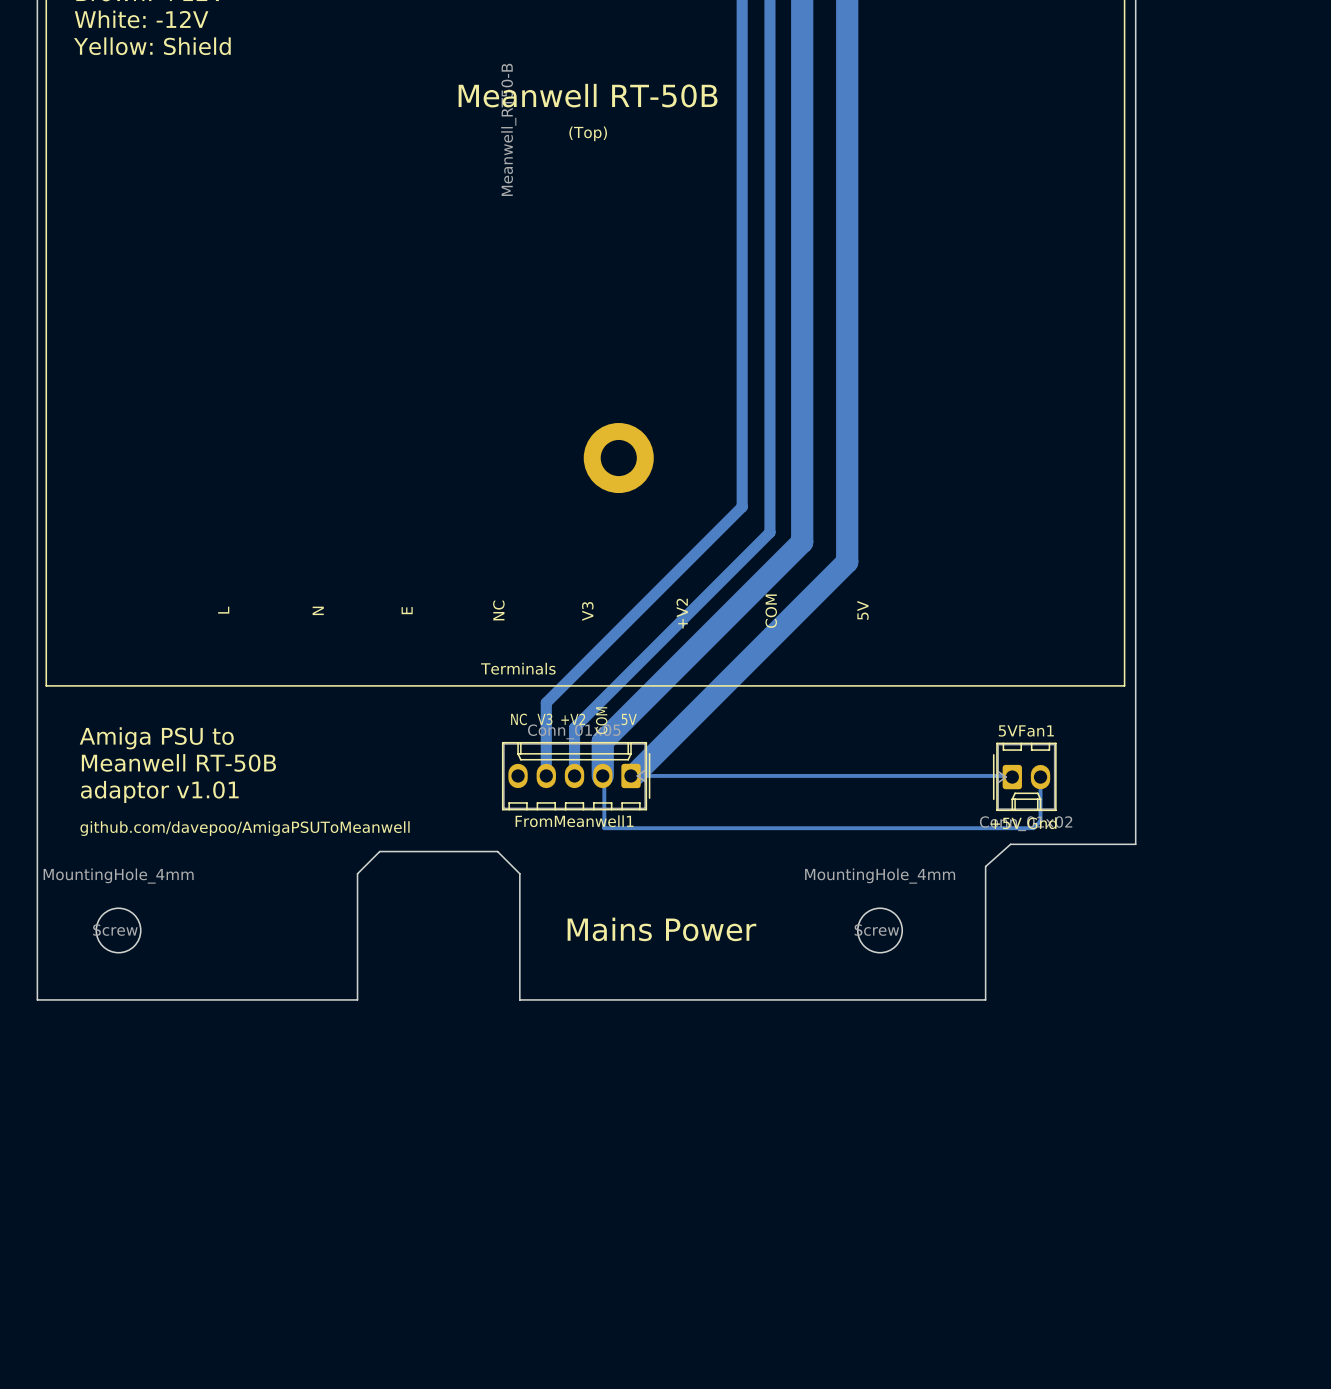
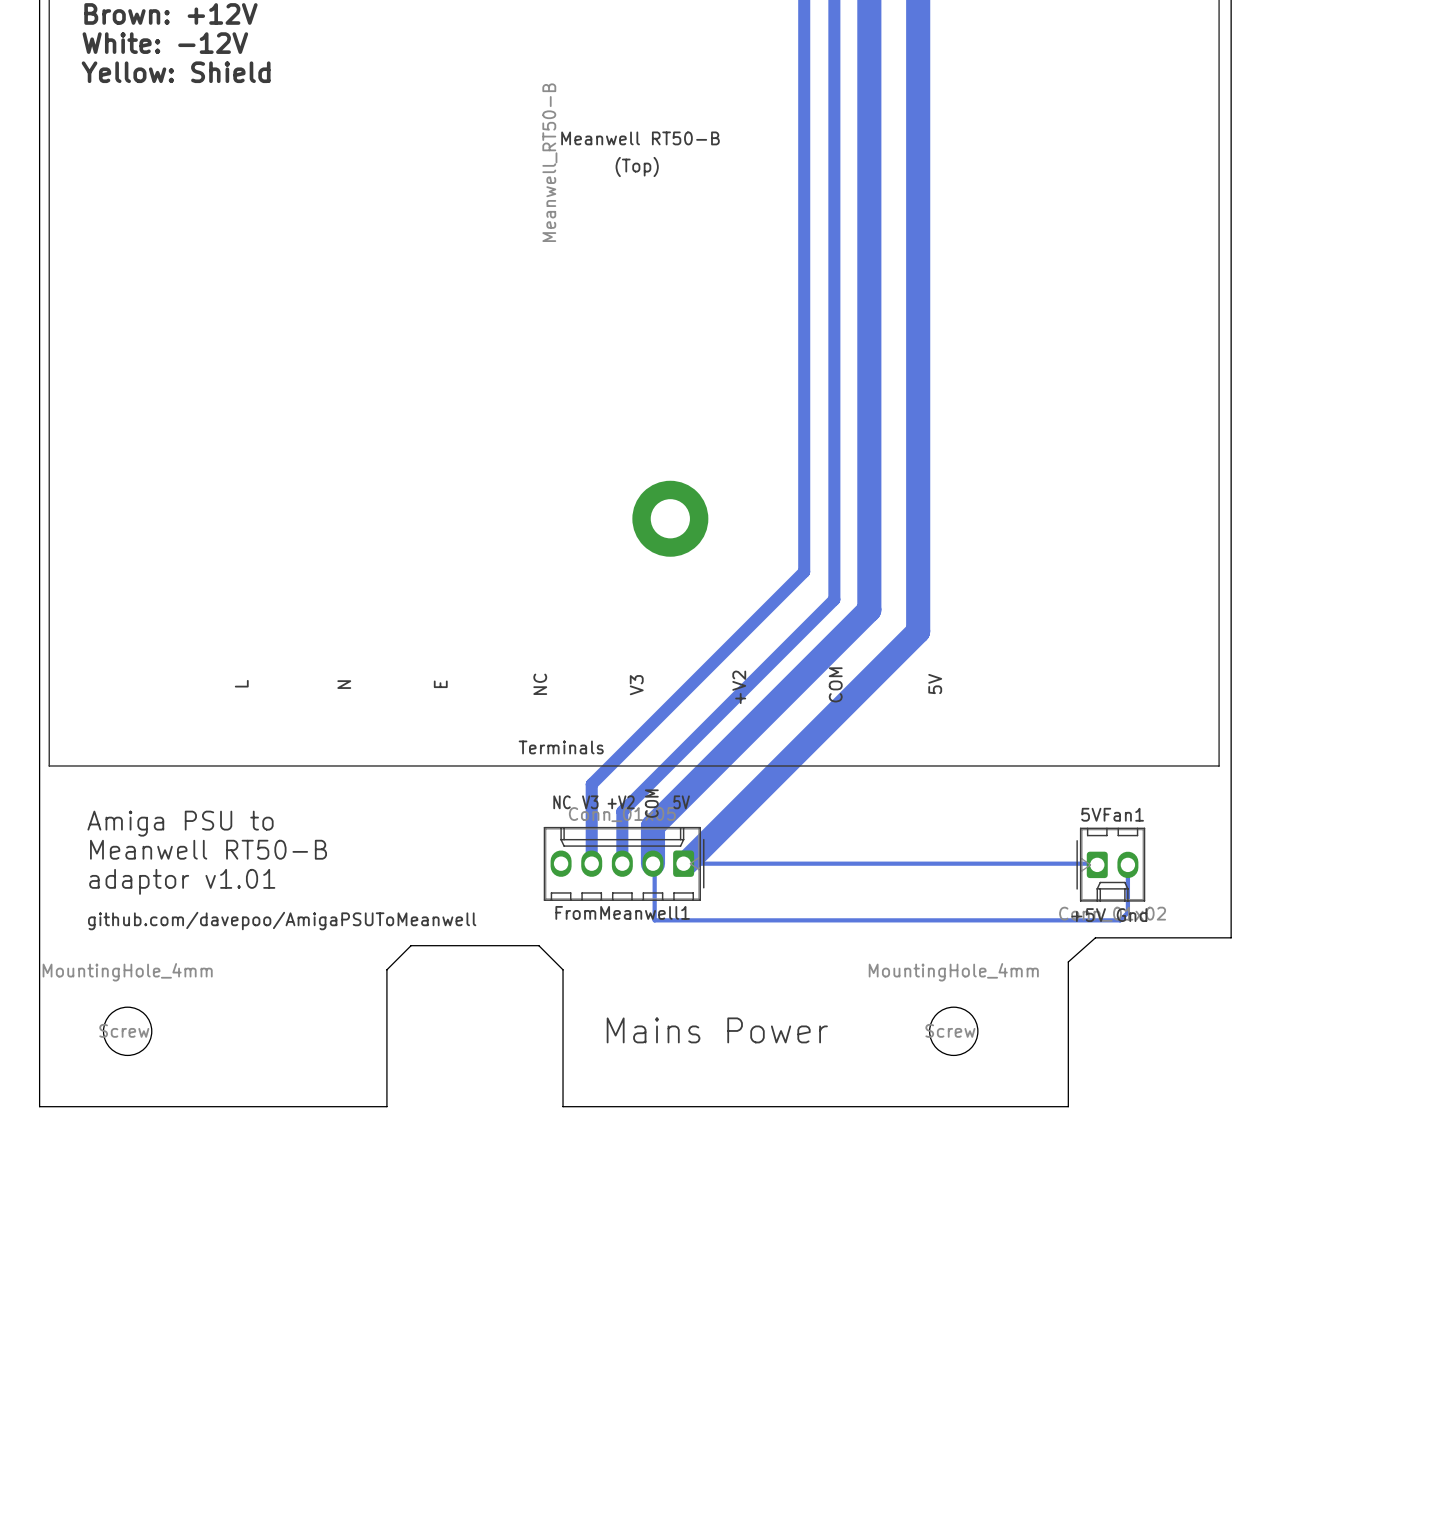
Meanwell RT-50B name: Meanwell RT-50B (588, 95) -> Meanwell RT50-B (640, 138)
text: Meanwell RT-50B (178, 762) -> Meanwell RT50-B (208, 849)

